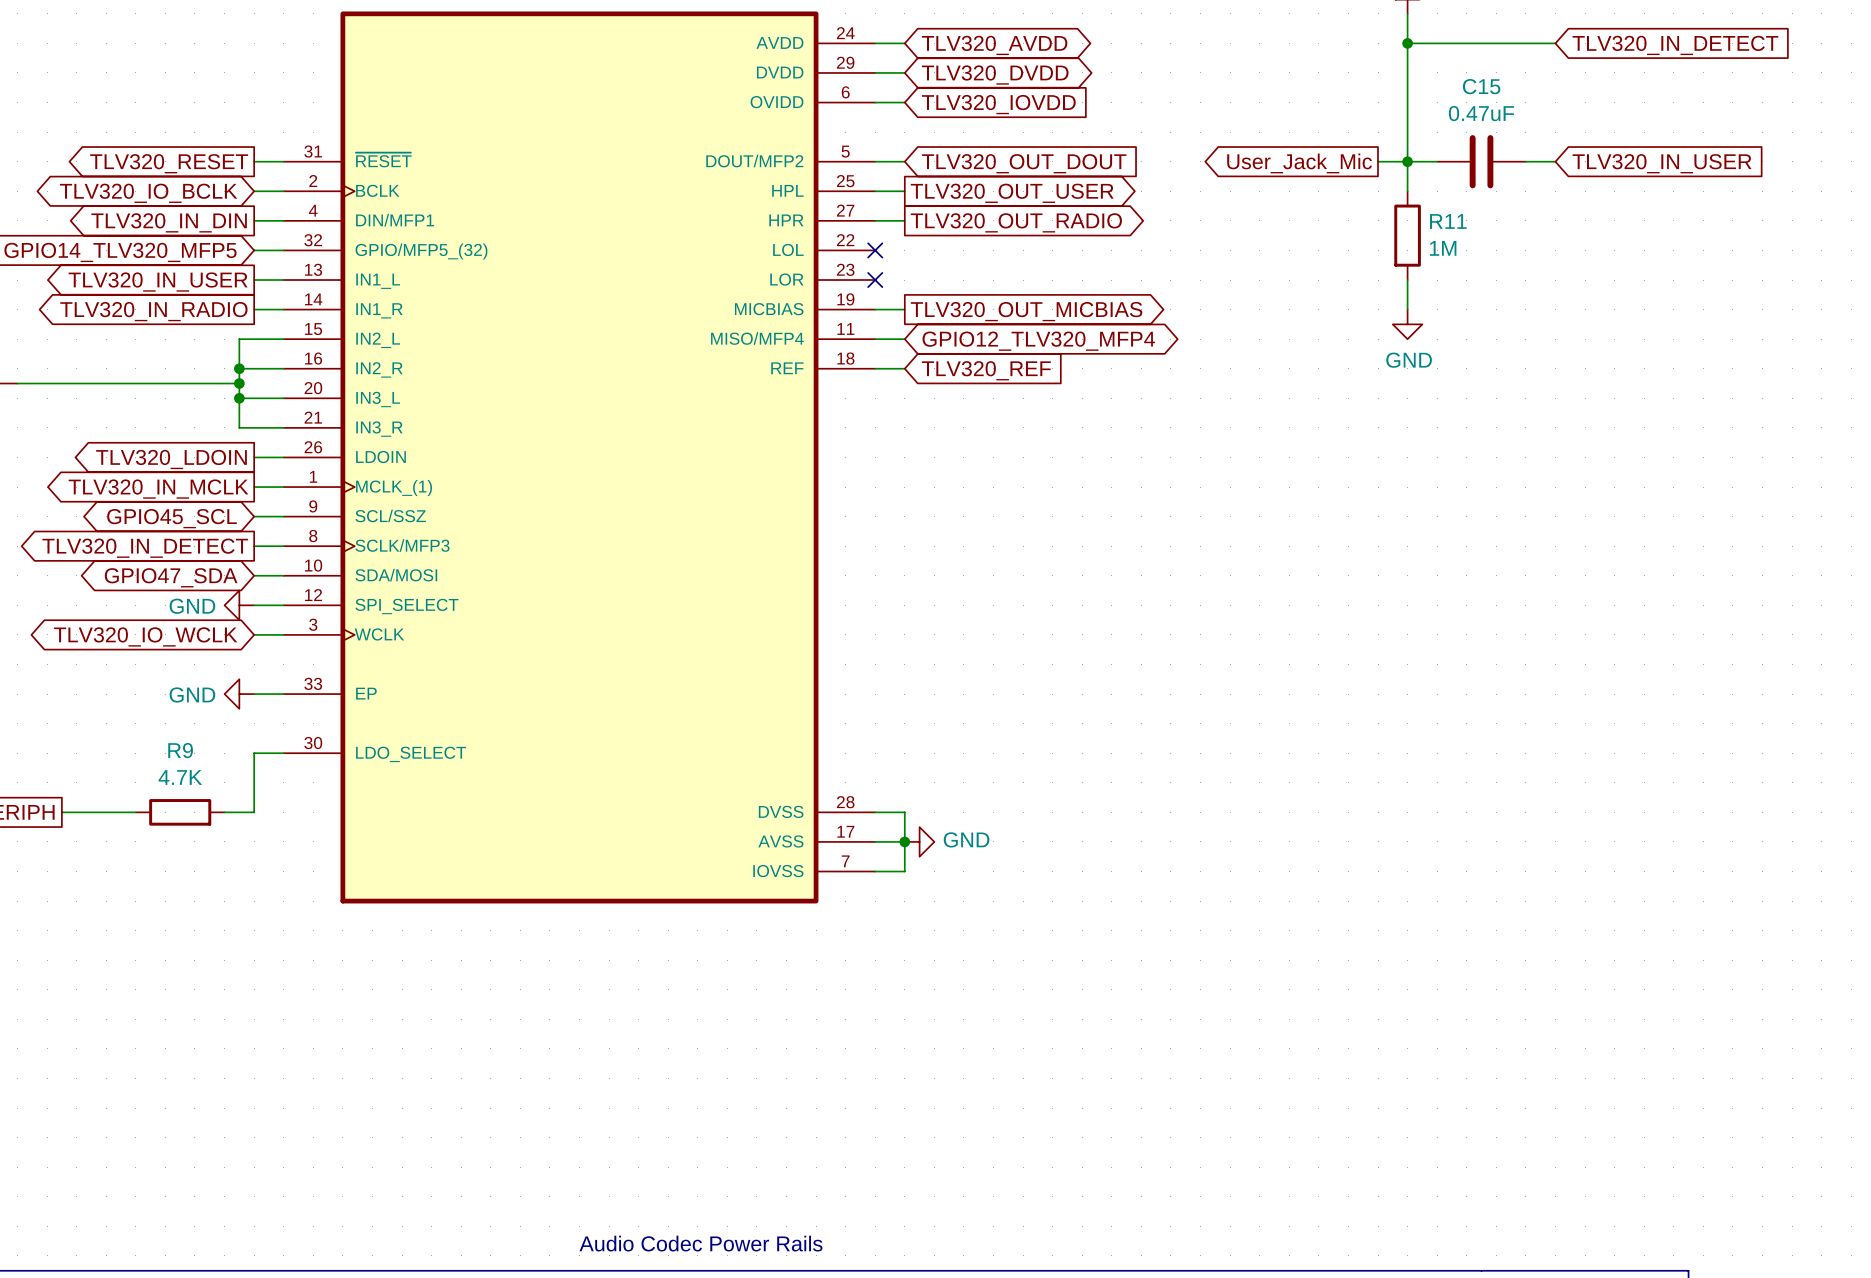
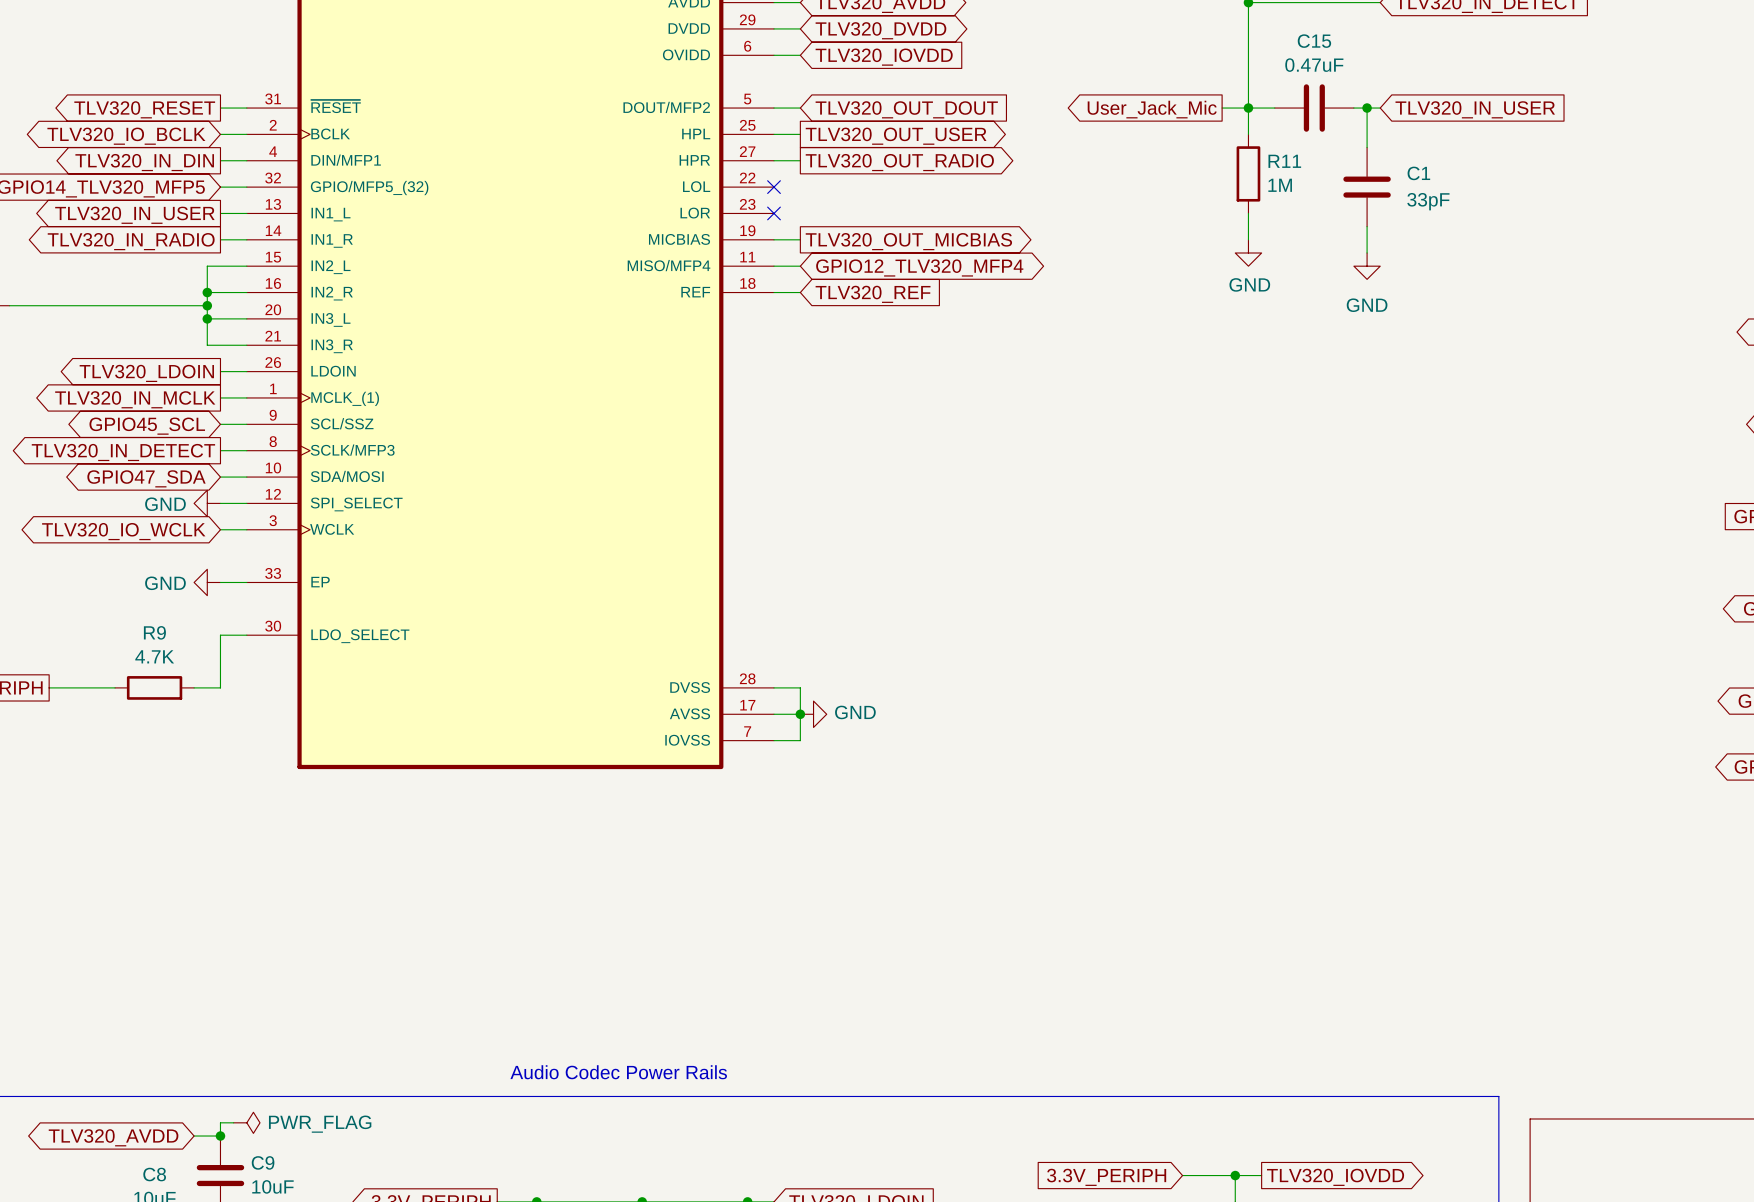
wire: none -> (1367, 108) (1367, 147)
junction: none -> (1367, 108)
C1: none -> 33pF (1367, 187)
wire: none -> (1367, 226) (1367, 253)
power symbol: none -> GND (1367, 266)

